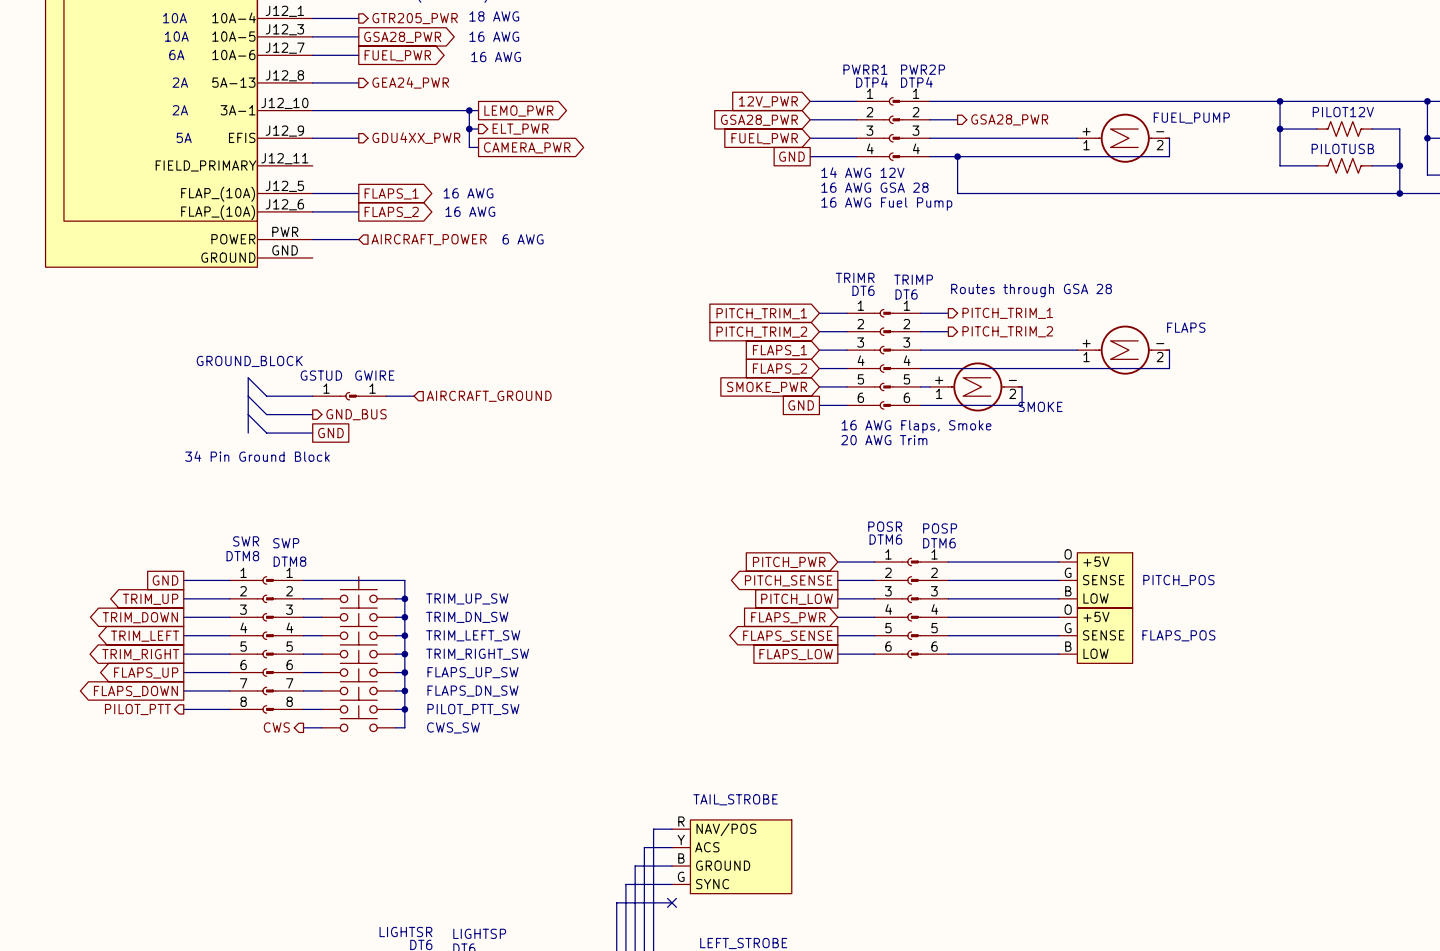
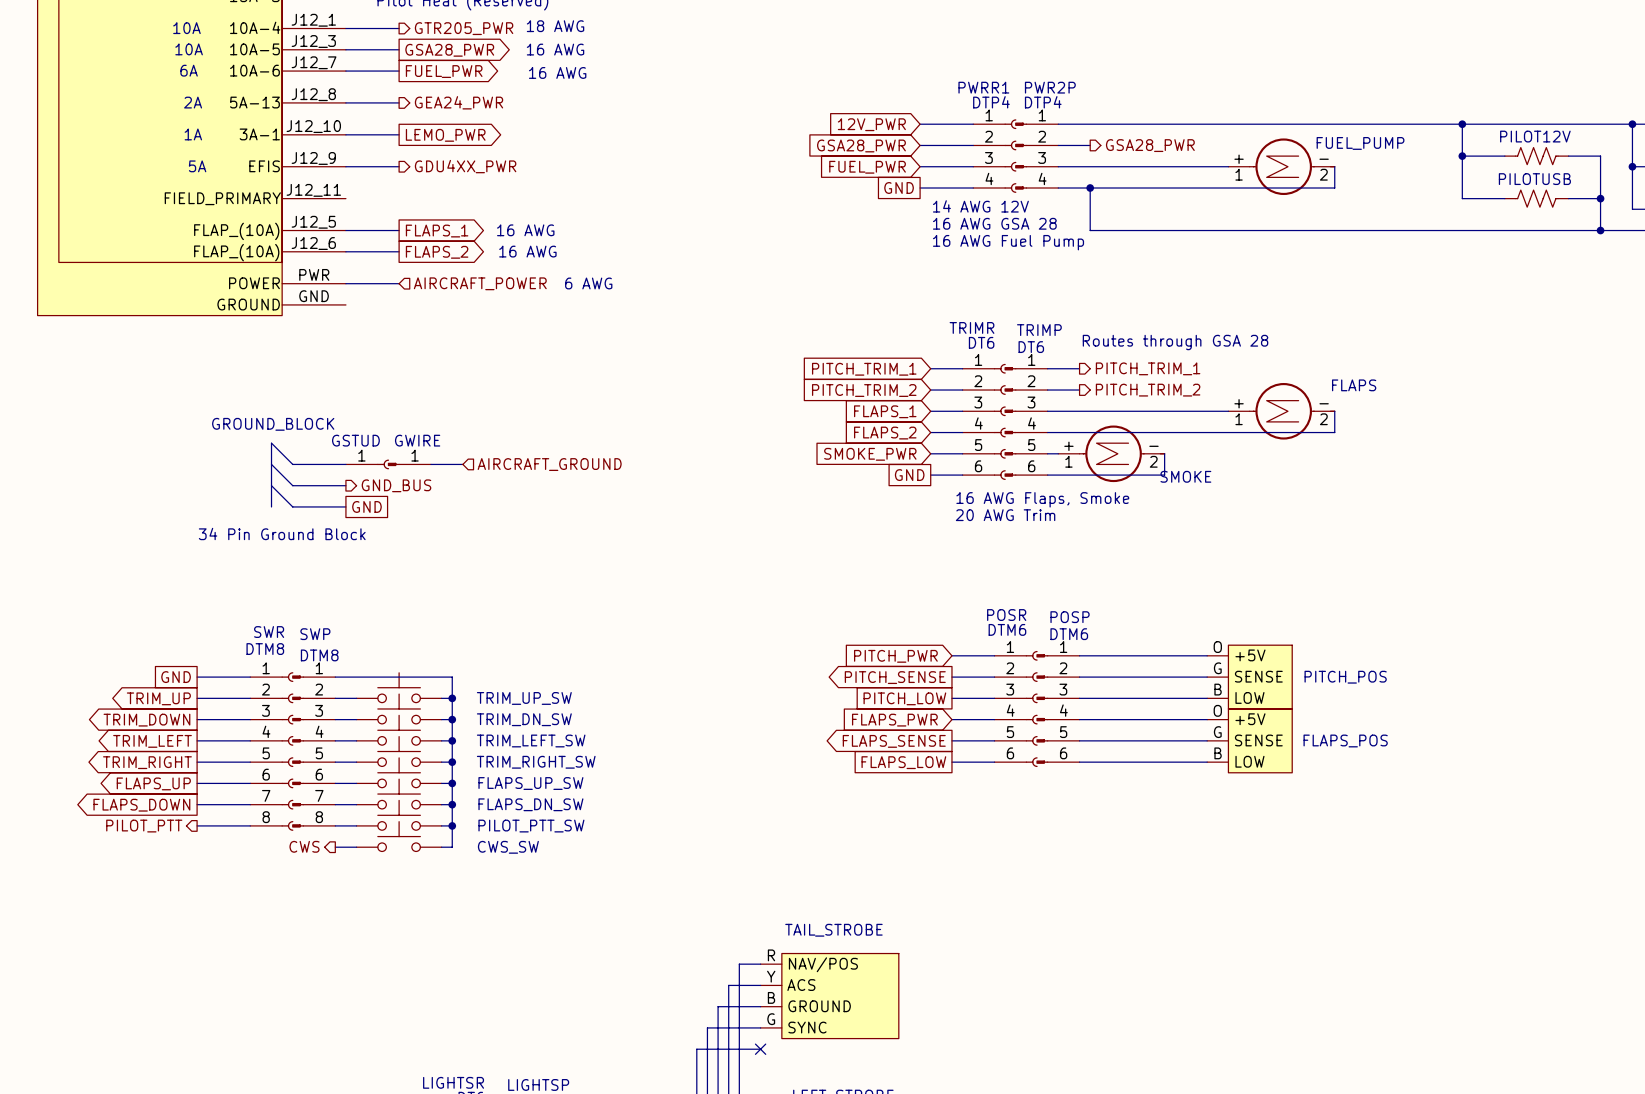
text: 2A (180, 110) -> 1A (193, 134)
wire: (358, 110) (478, 110) -> none
wire: (469, 110) (469, 147) (478, 147) -> none
junction: (469, 110) -> none
global label position: LEMO_PWR (518, 111) -> LEMO_PWR (445, 135)
wire: (469, 129) (478, 129) -> none
junction: (469, 129) -> none
hierarchical label: ELT_PWR (520, 129) -> none
global label: CAMERA_PWR (527, 147) -> none

